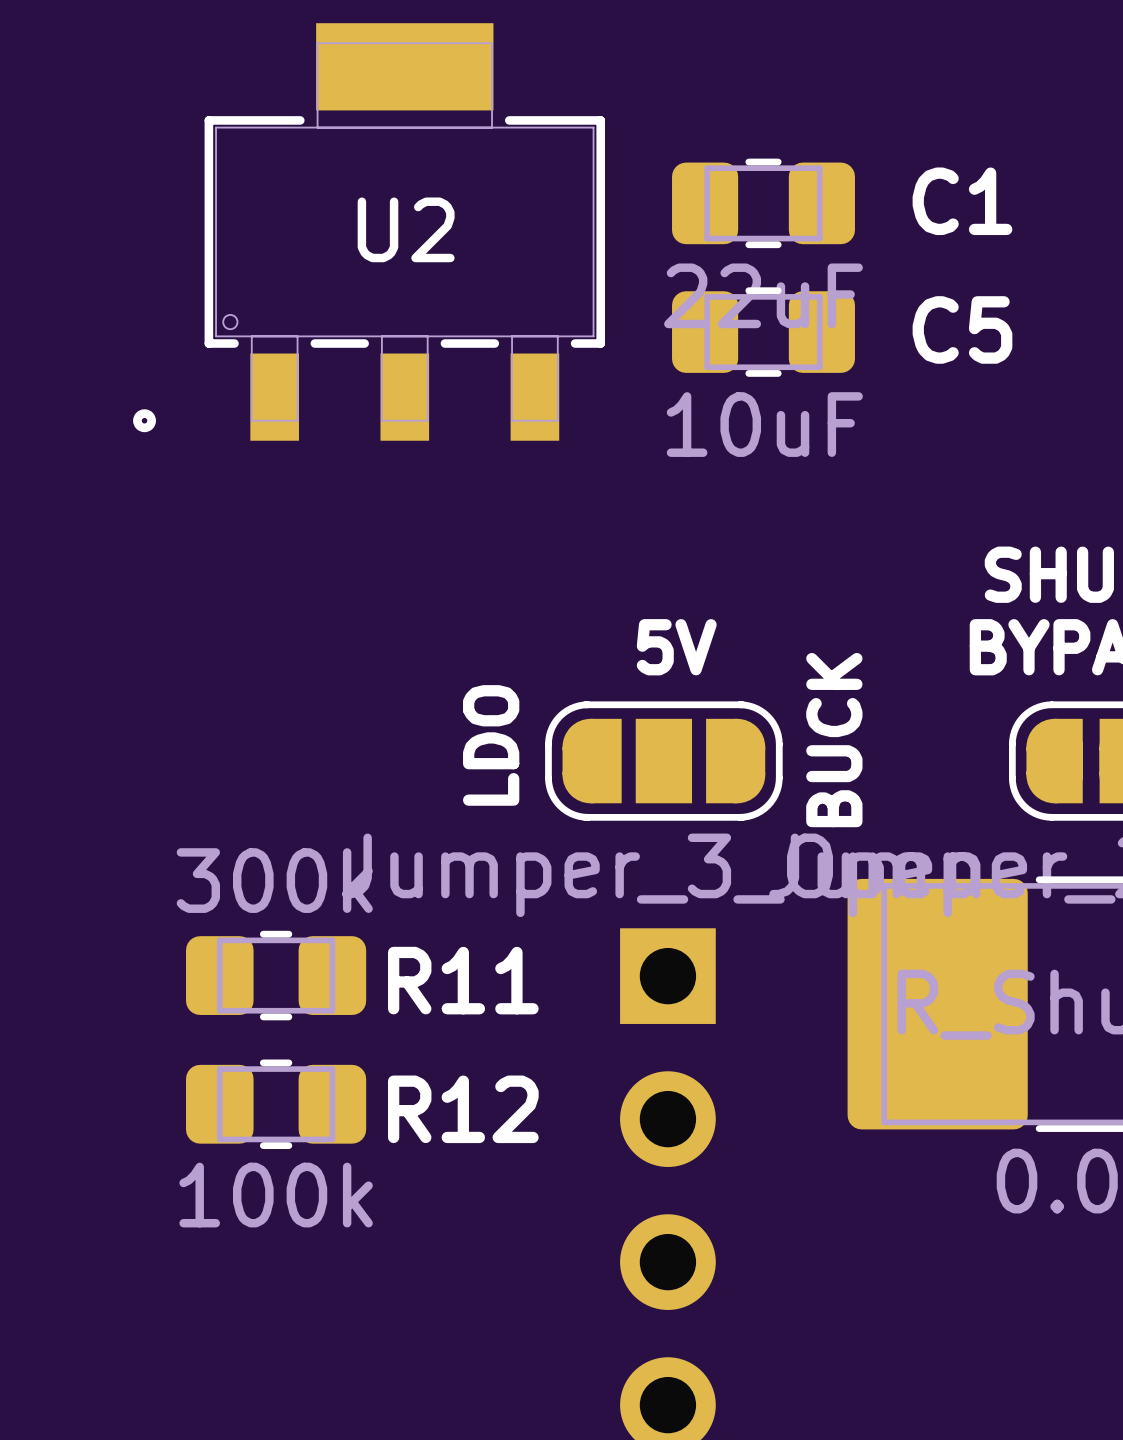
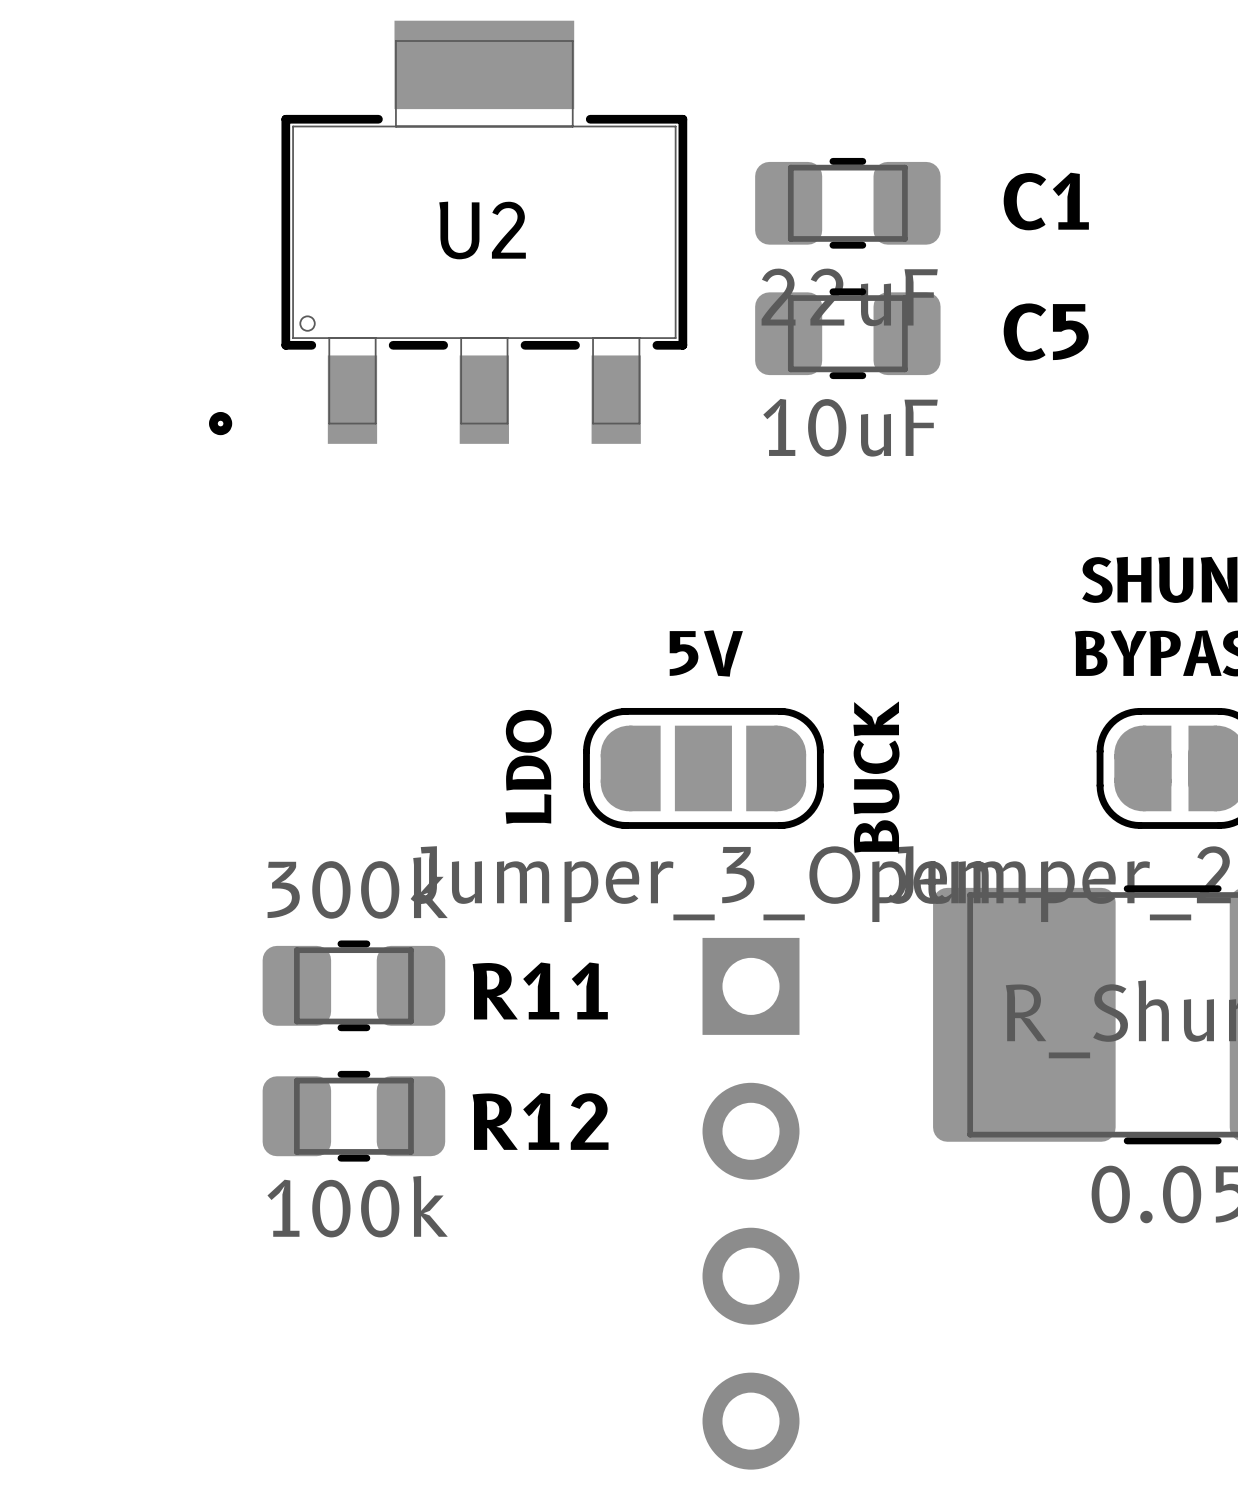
text position: 5V (676, 647) -> 5V (706, 653)
text position: BUCK (834, 740) -> BUCK (876, 777)
text position: LDO (491, 745) -> LDO (528, 766)
part position: (663, 761) -> (703, 768)

